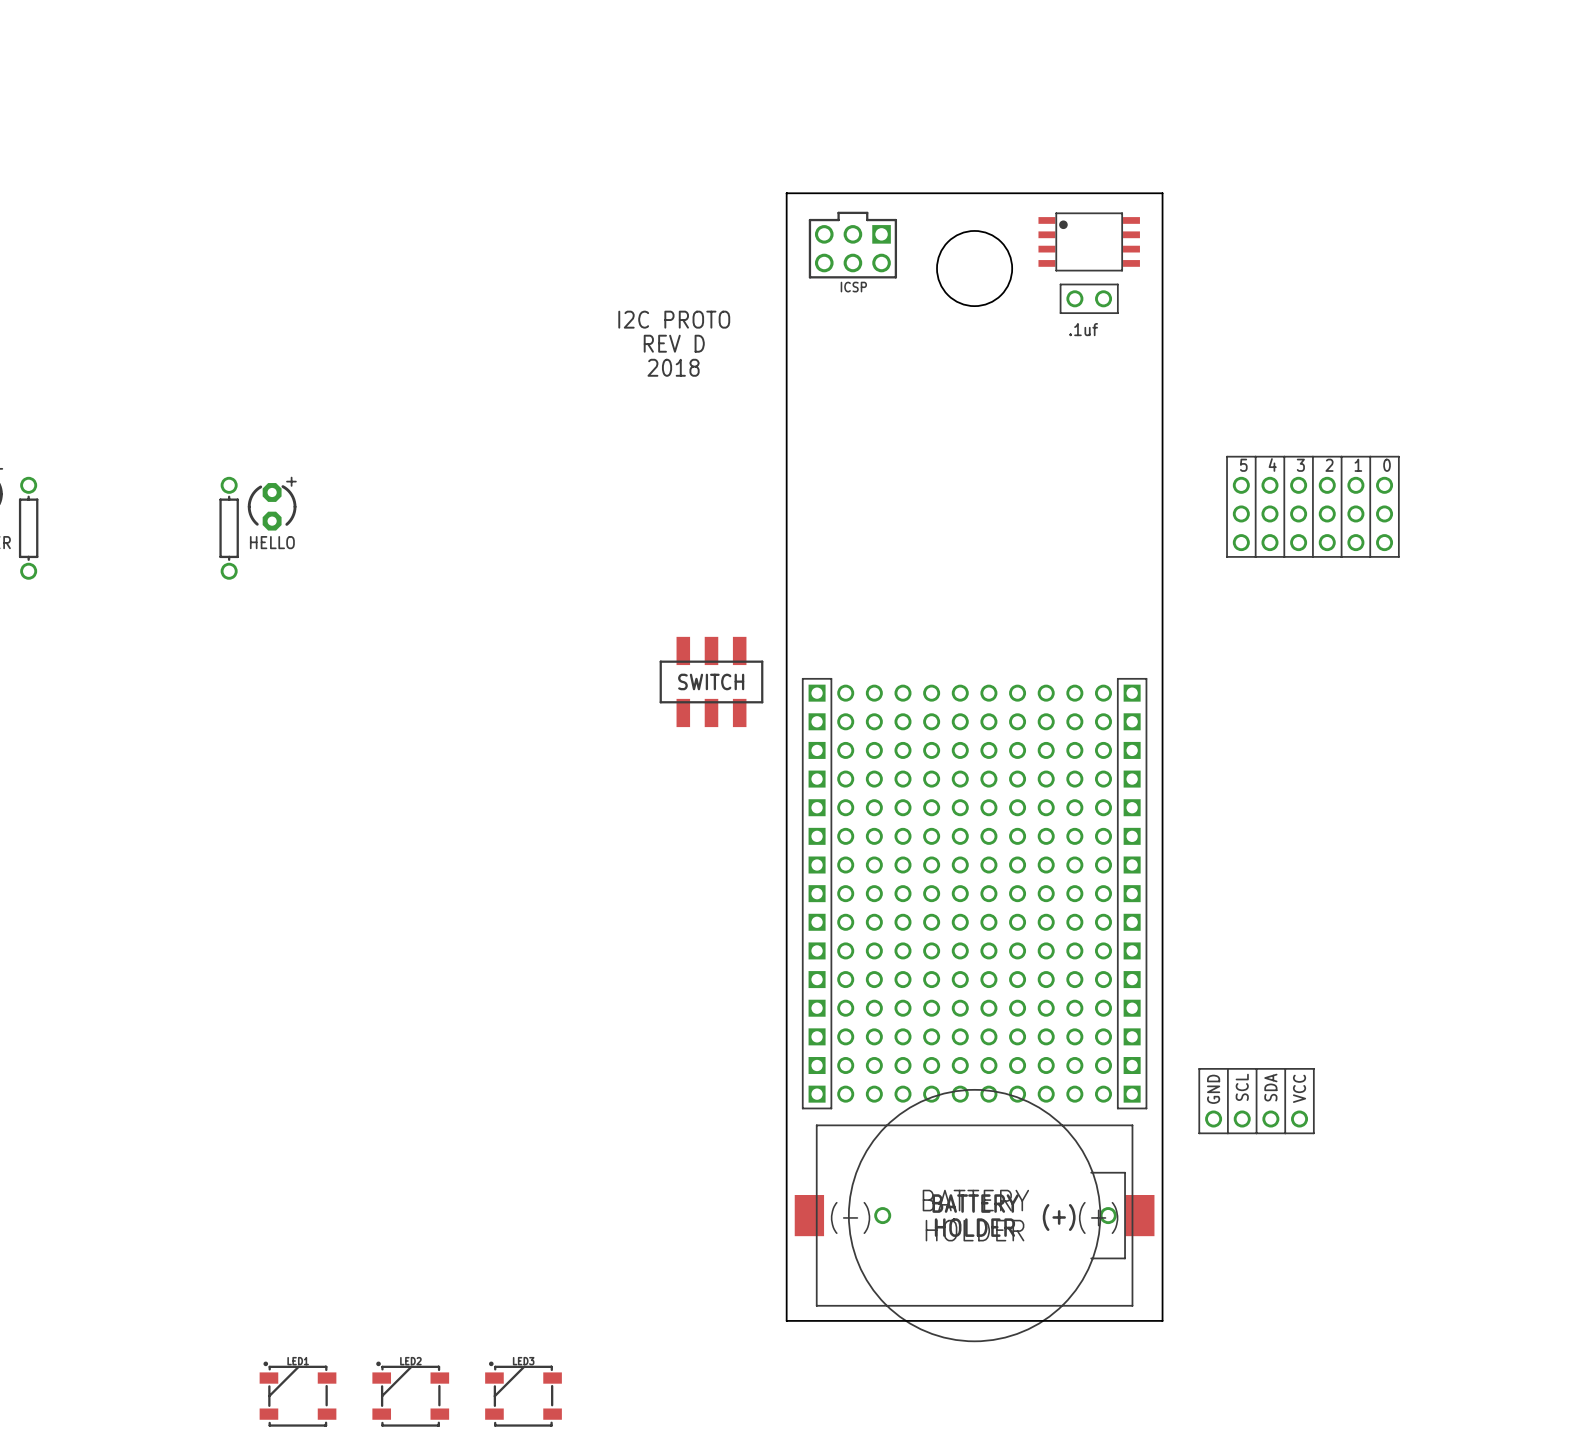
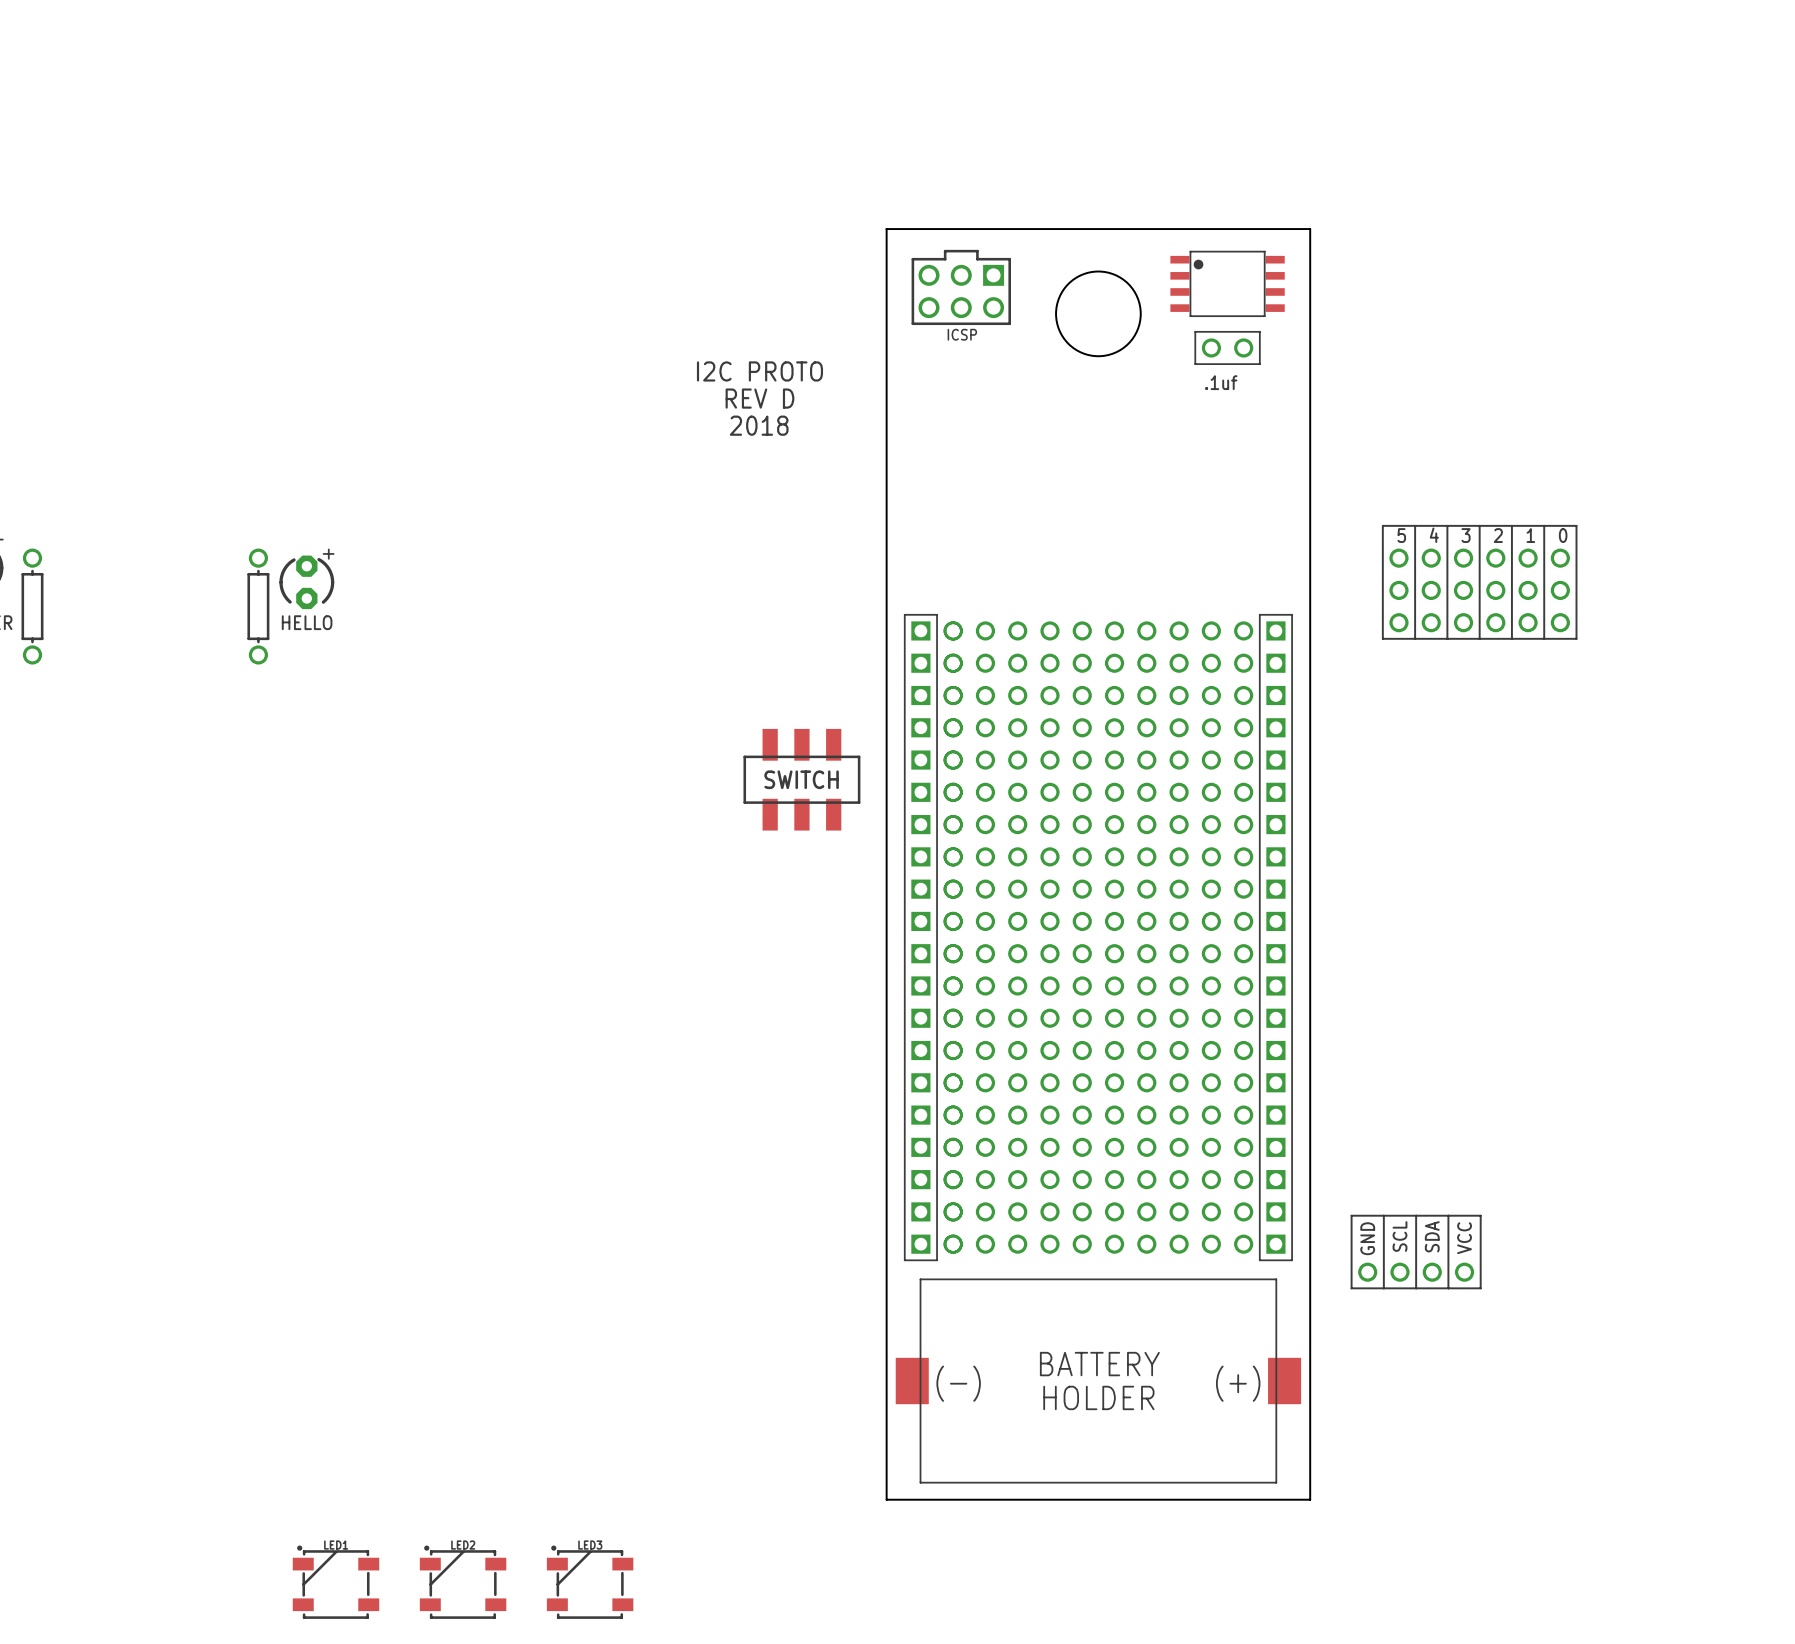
part: none -> (1098, 937)
part: (974, 893) -> none
part: (986, 1215) -> none

